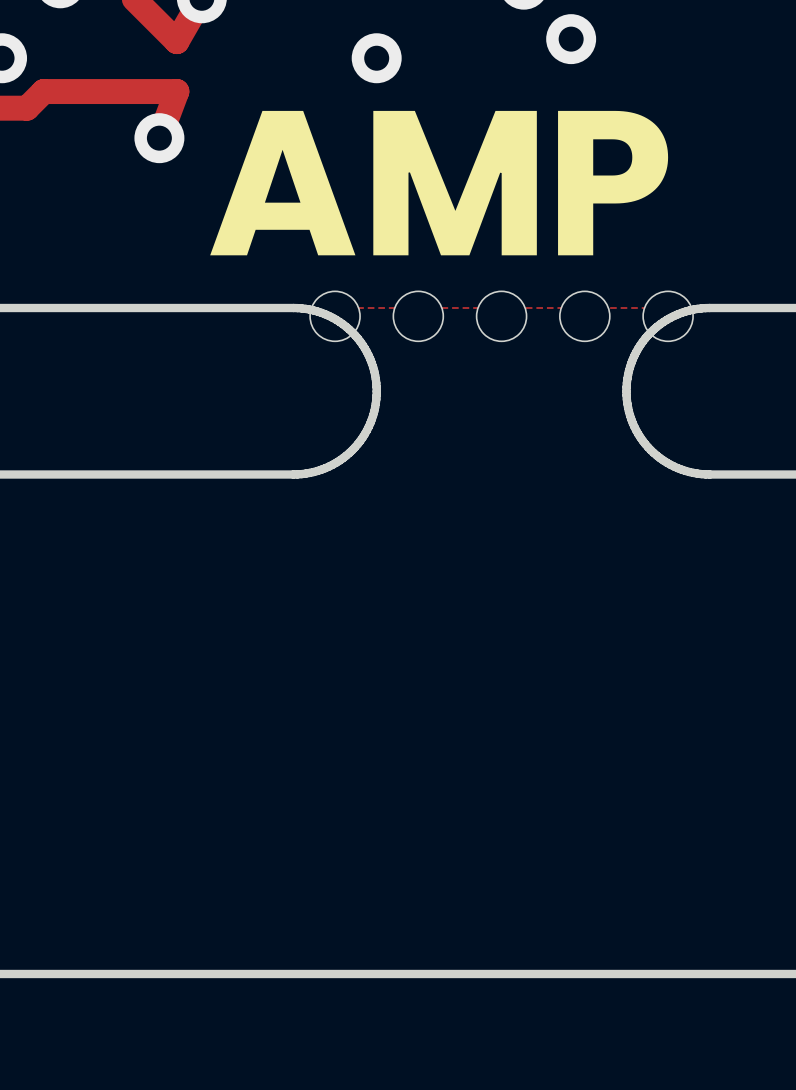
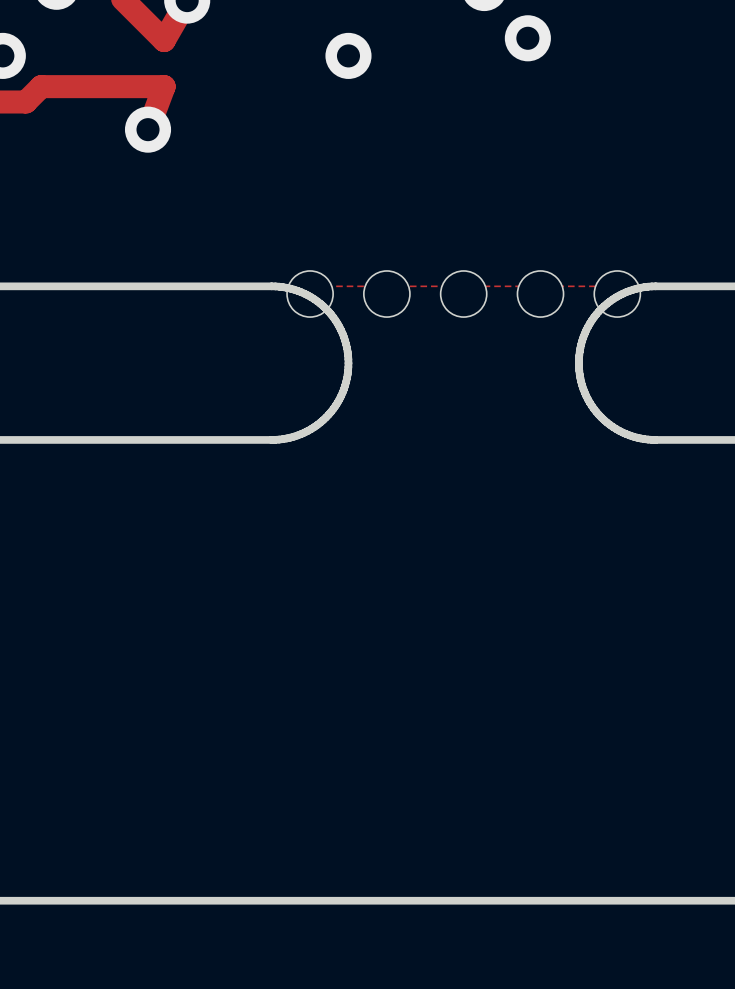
drawing: [210, 110, 669, 256] -> none

